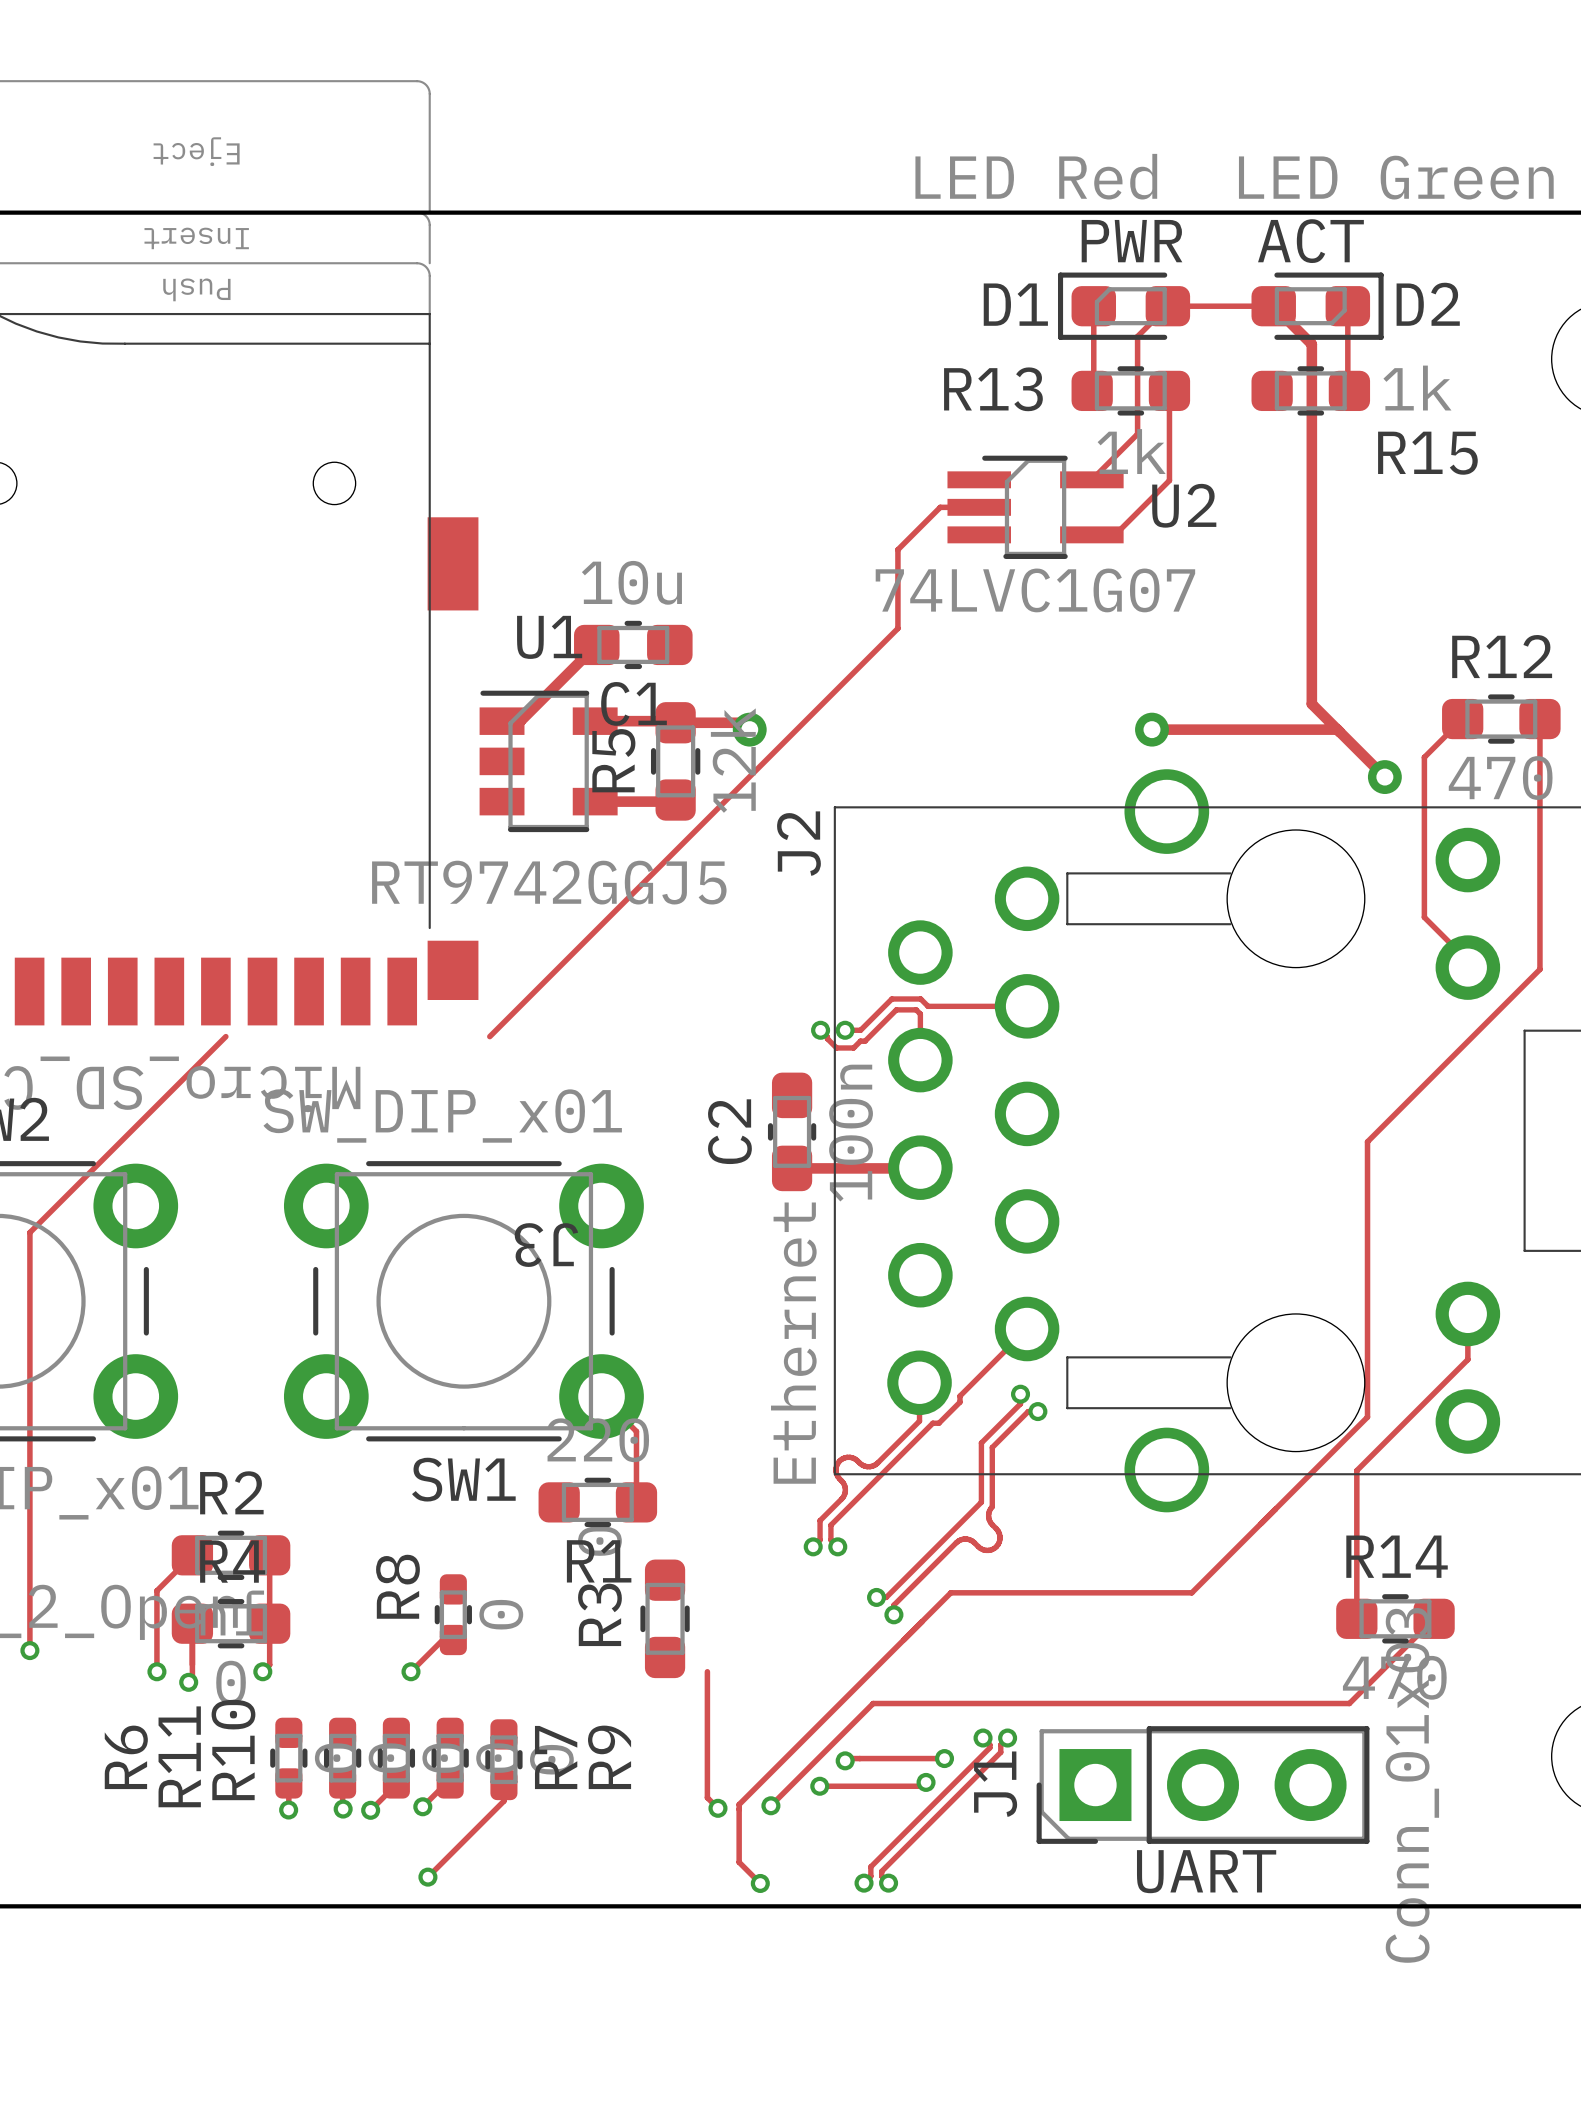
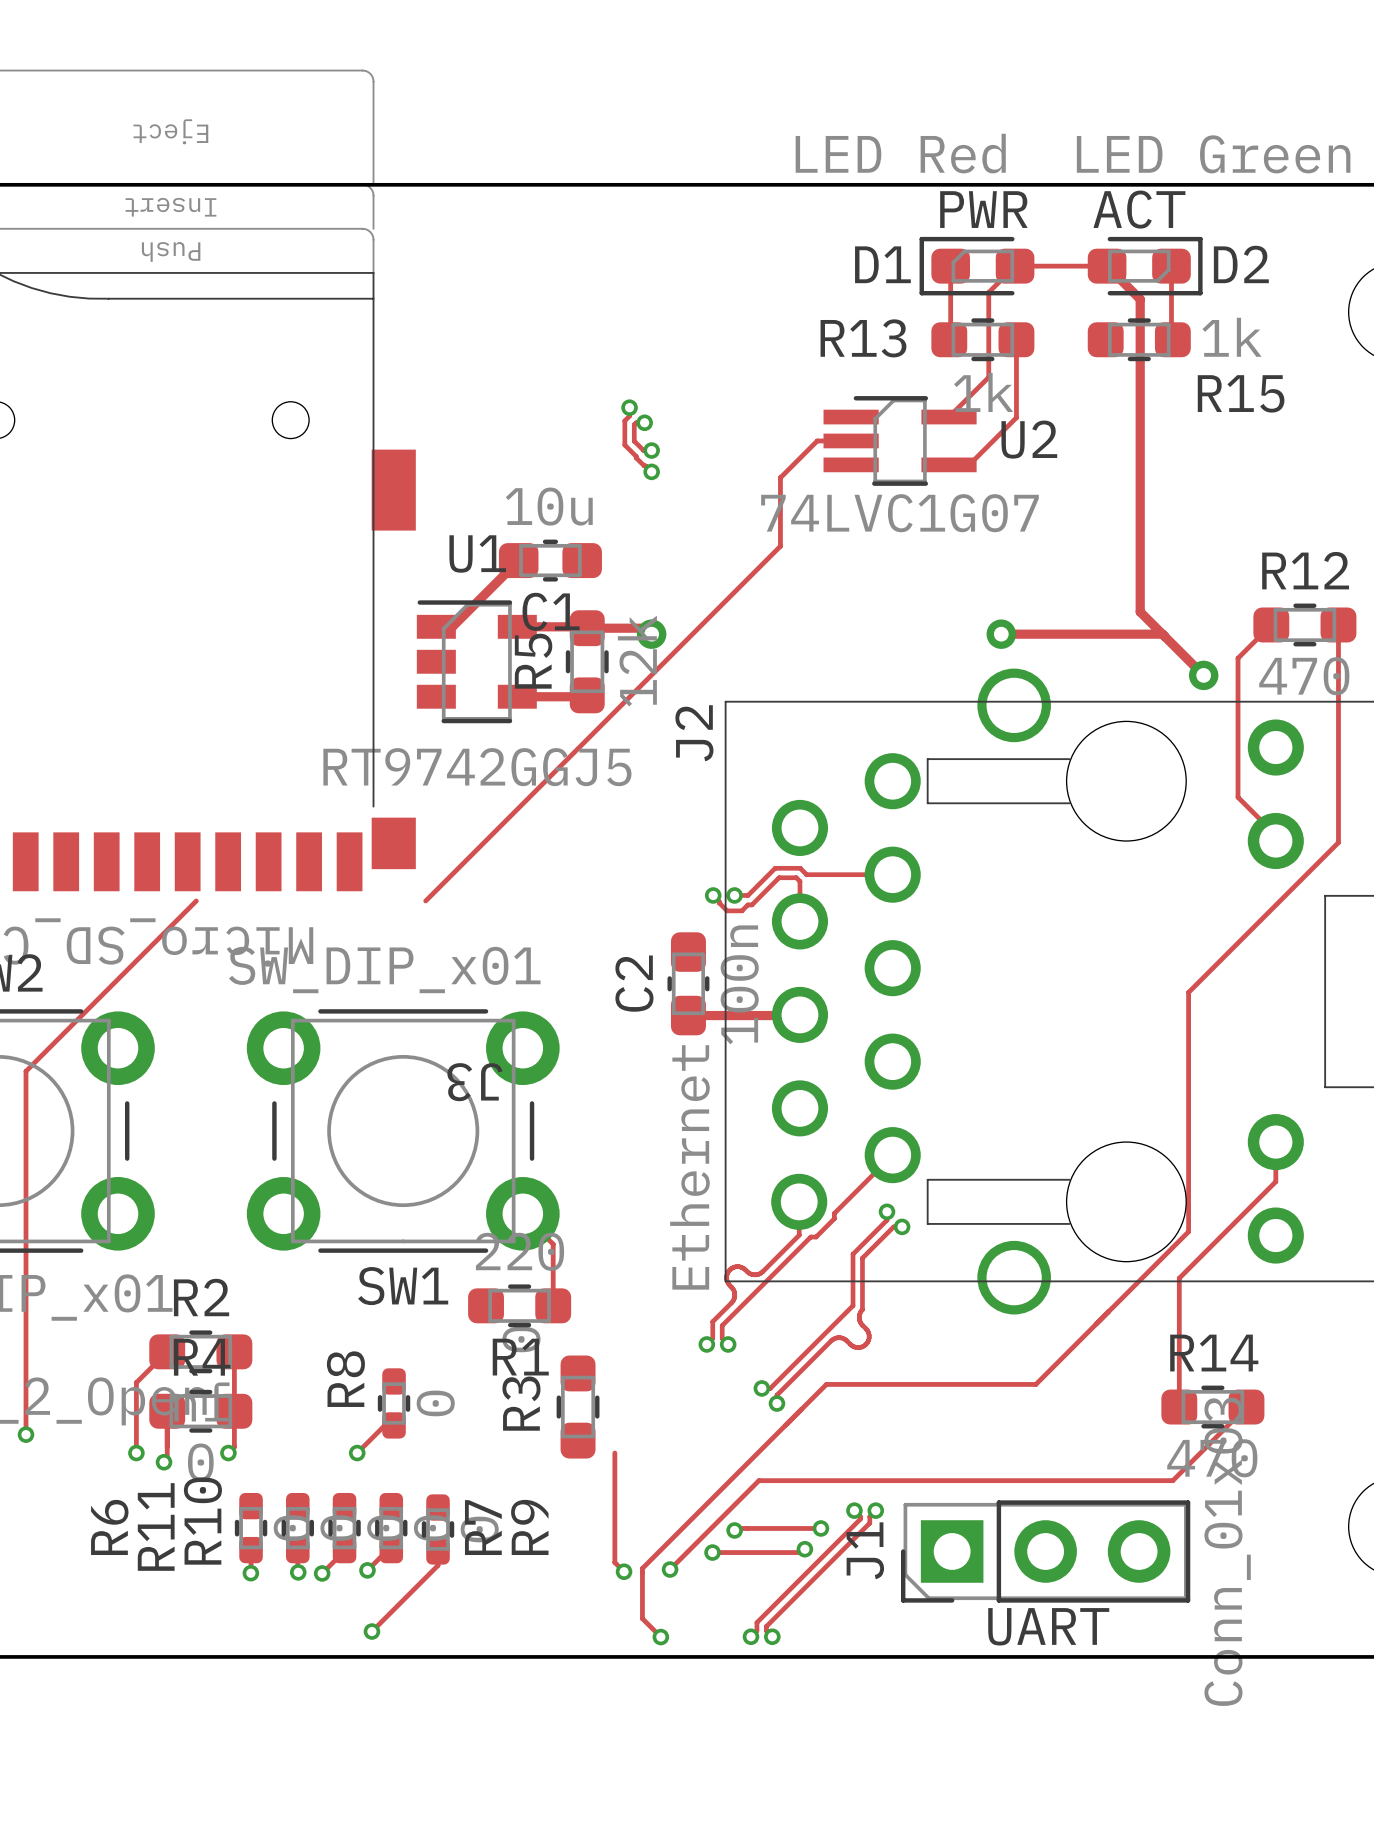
track: none -> (629, 407) (629, 416) (624, 420) (624, 445) (651, 471)
via: none -> (629, 407)
track: none -> (644, 422) (636, 422) (634, 424) (634, 441) (643, 450) (651, 450)
via: none -> (644, 422)
via: none -> (651, 450)
via: none -> (651, 471)

